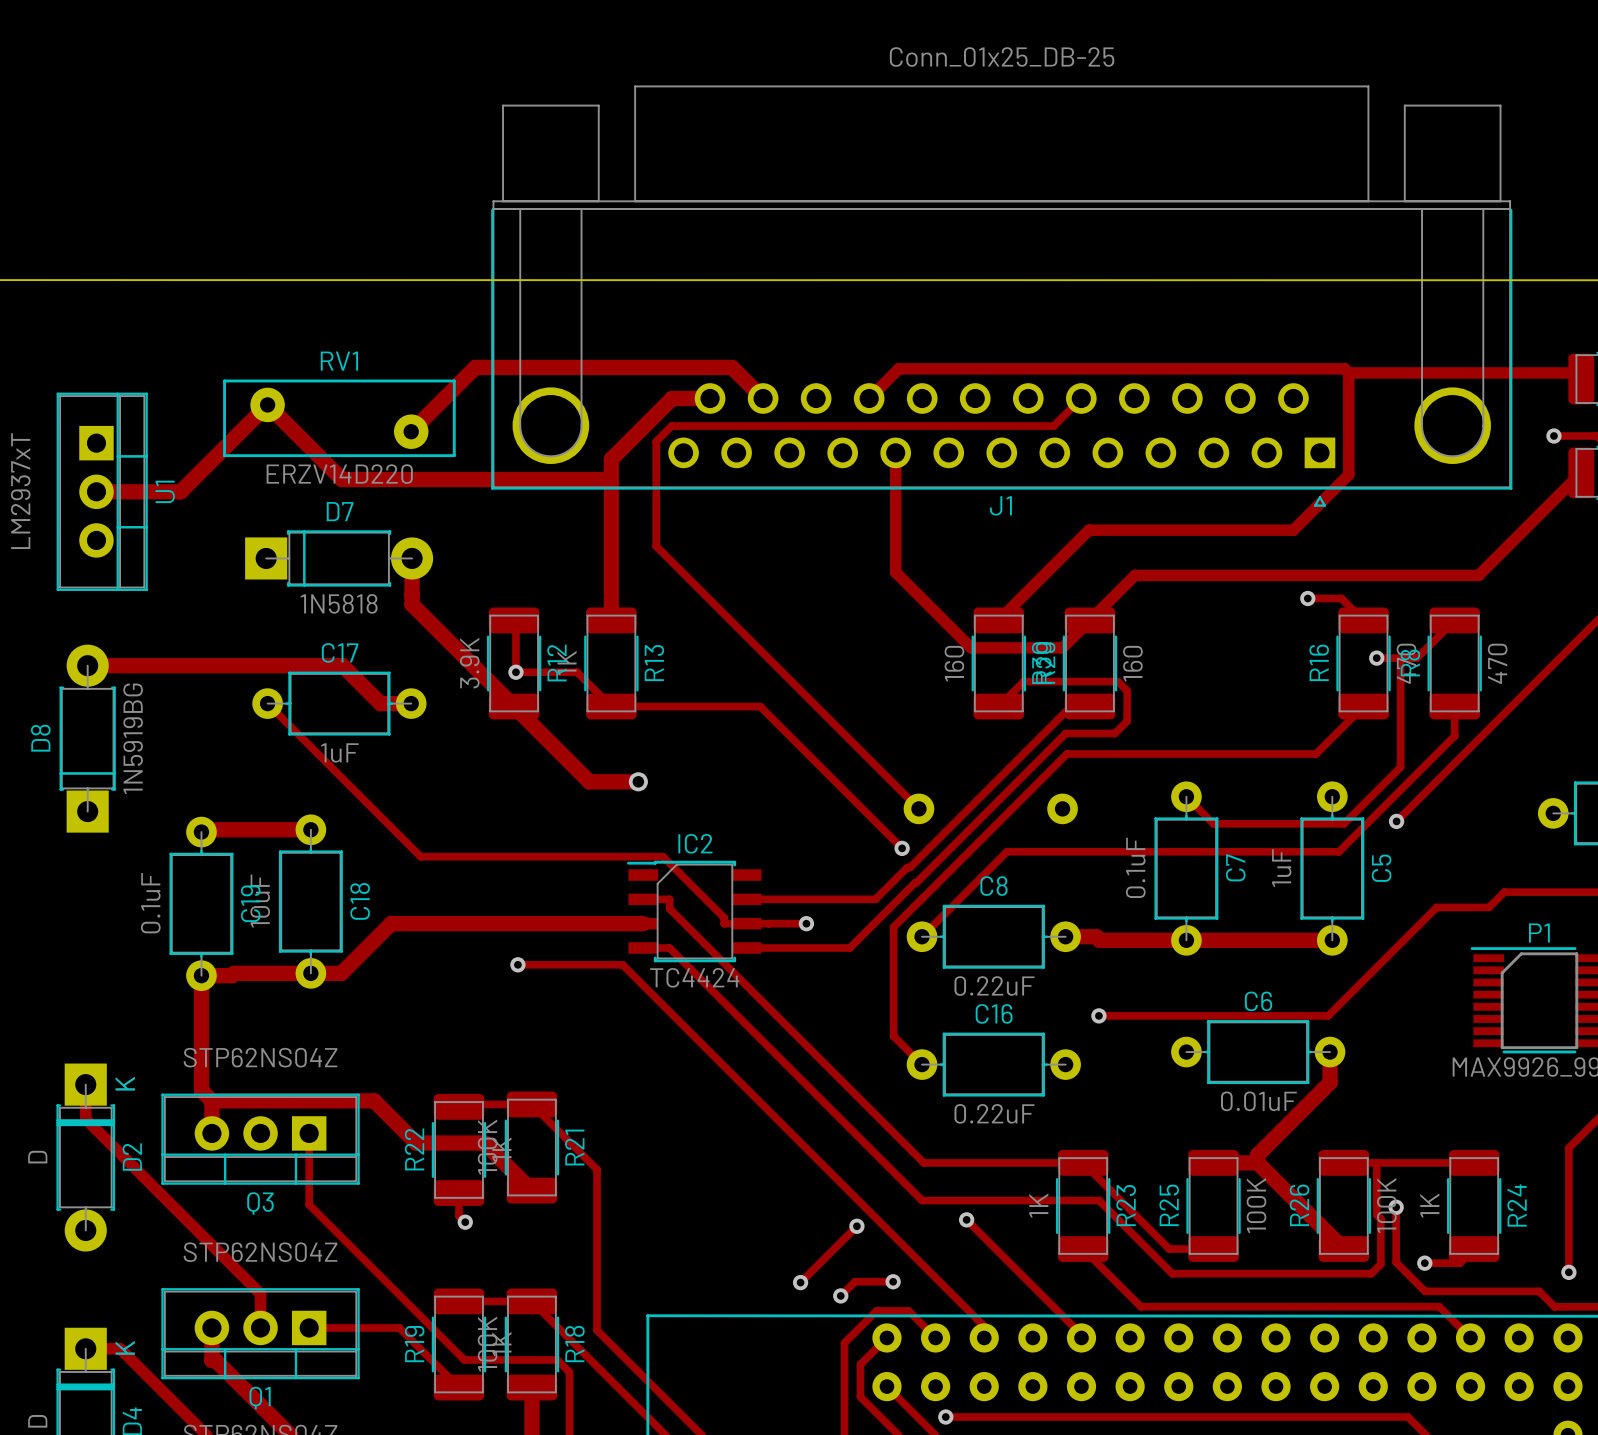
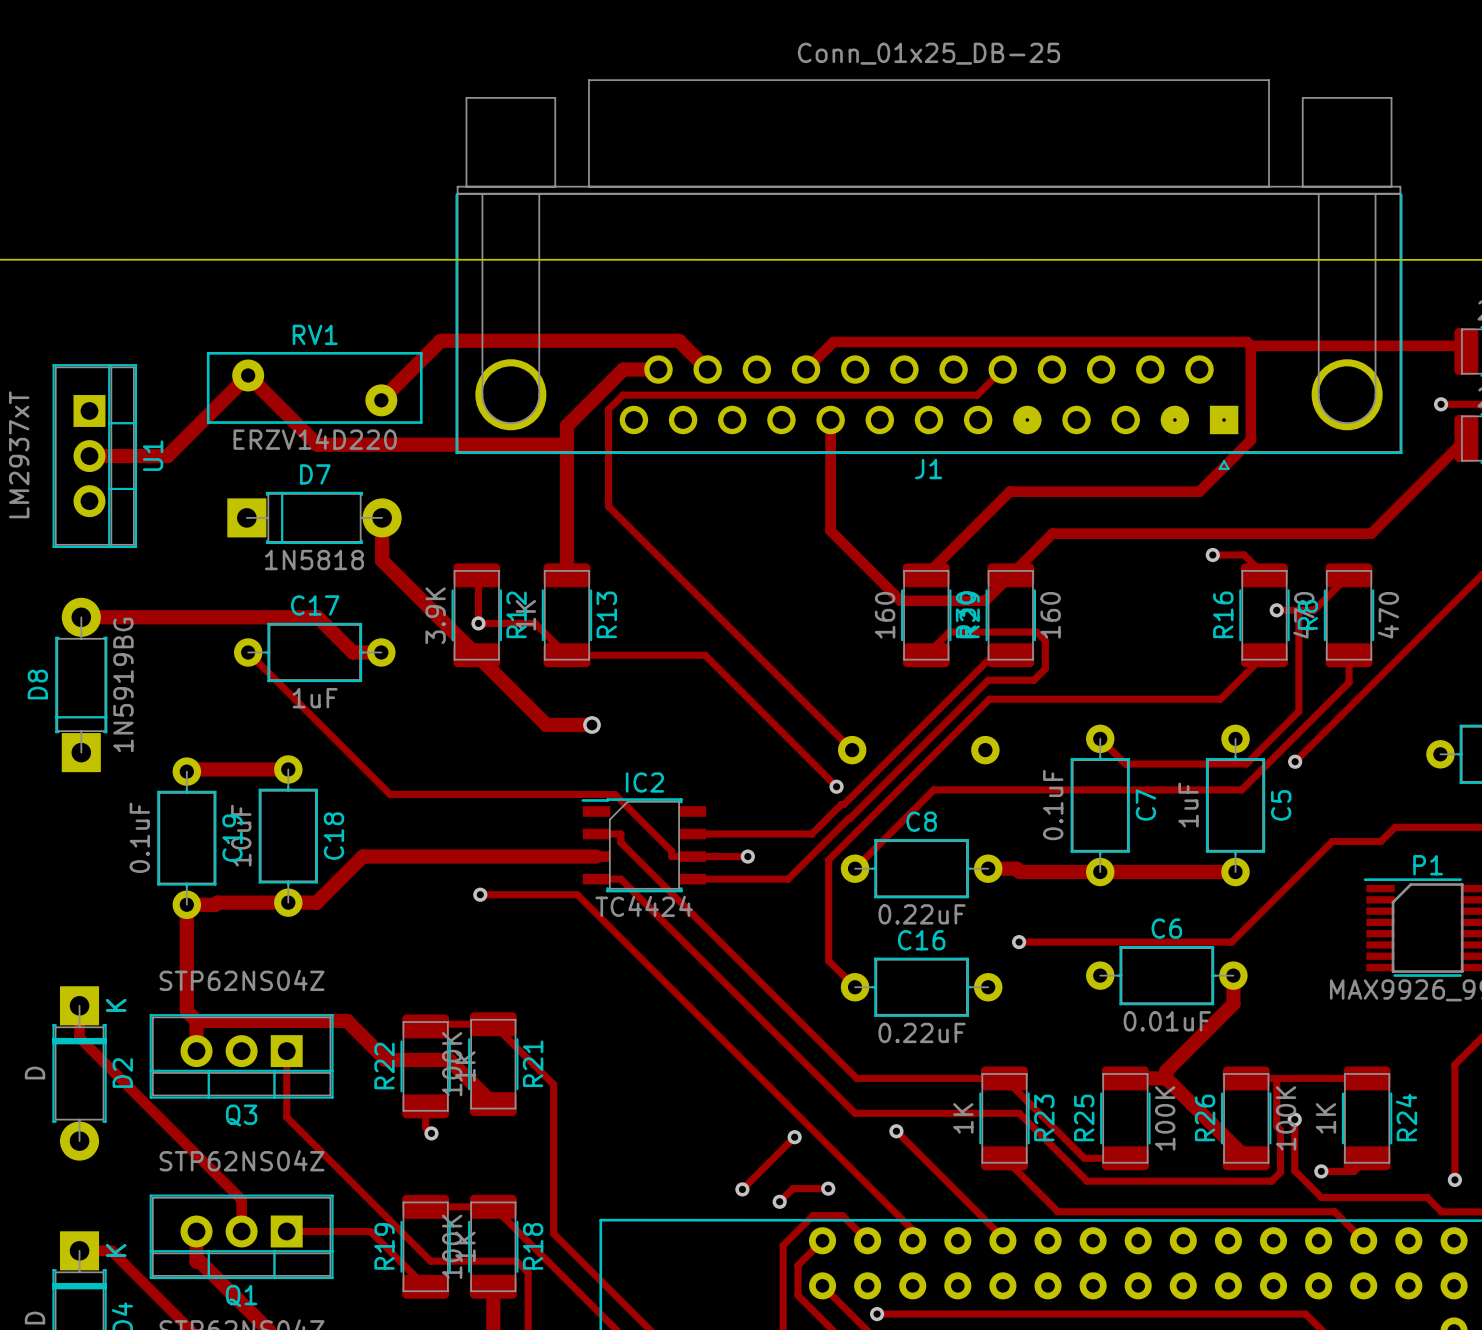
J1 footprint: [491, 85, 1513, 507] -> [455, 79, 1403, 470]

